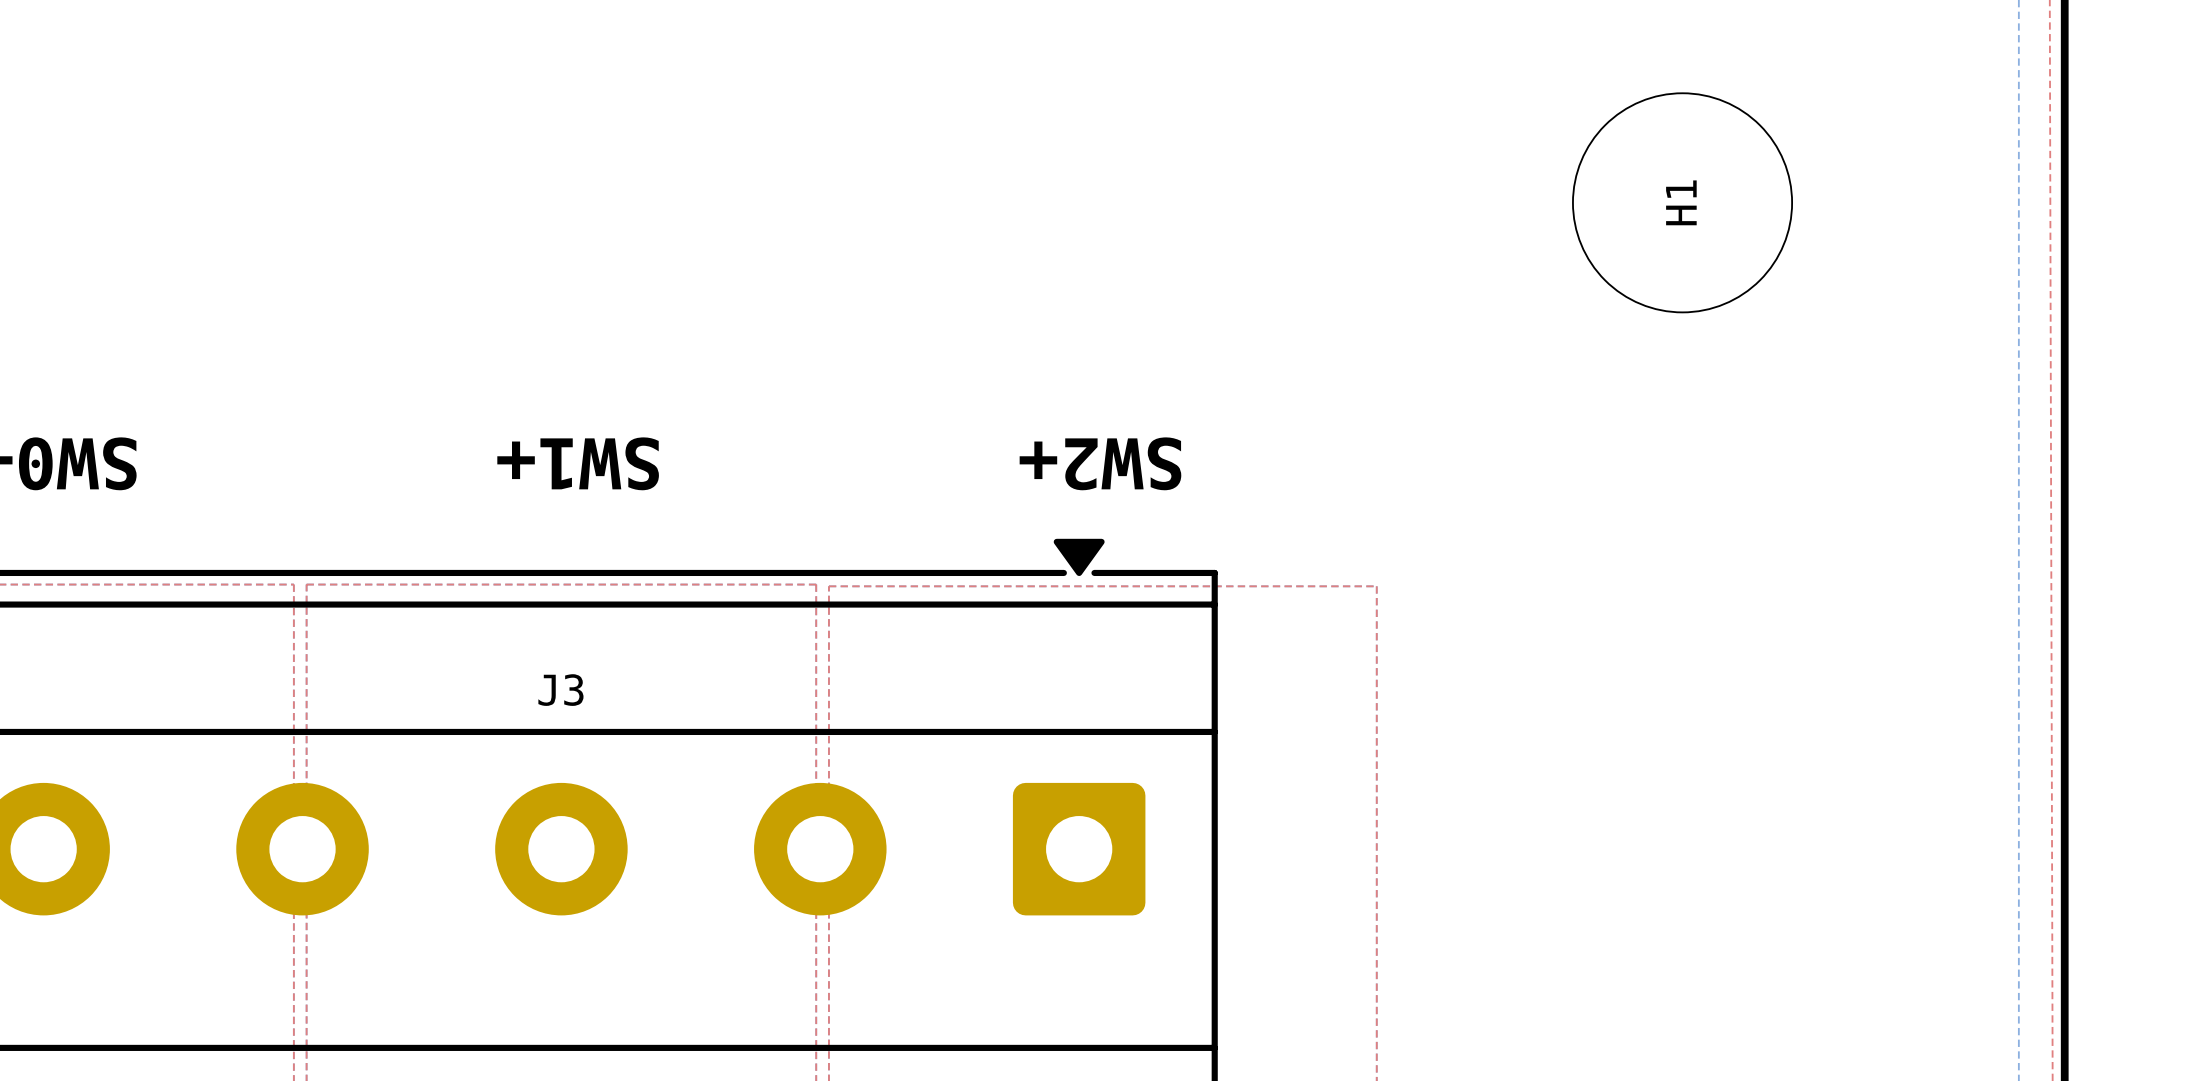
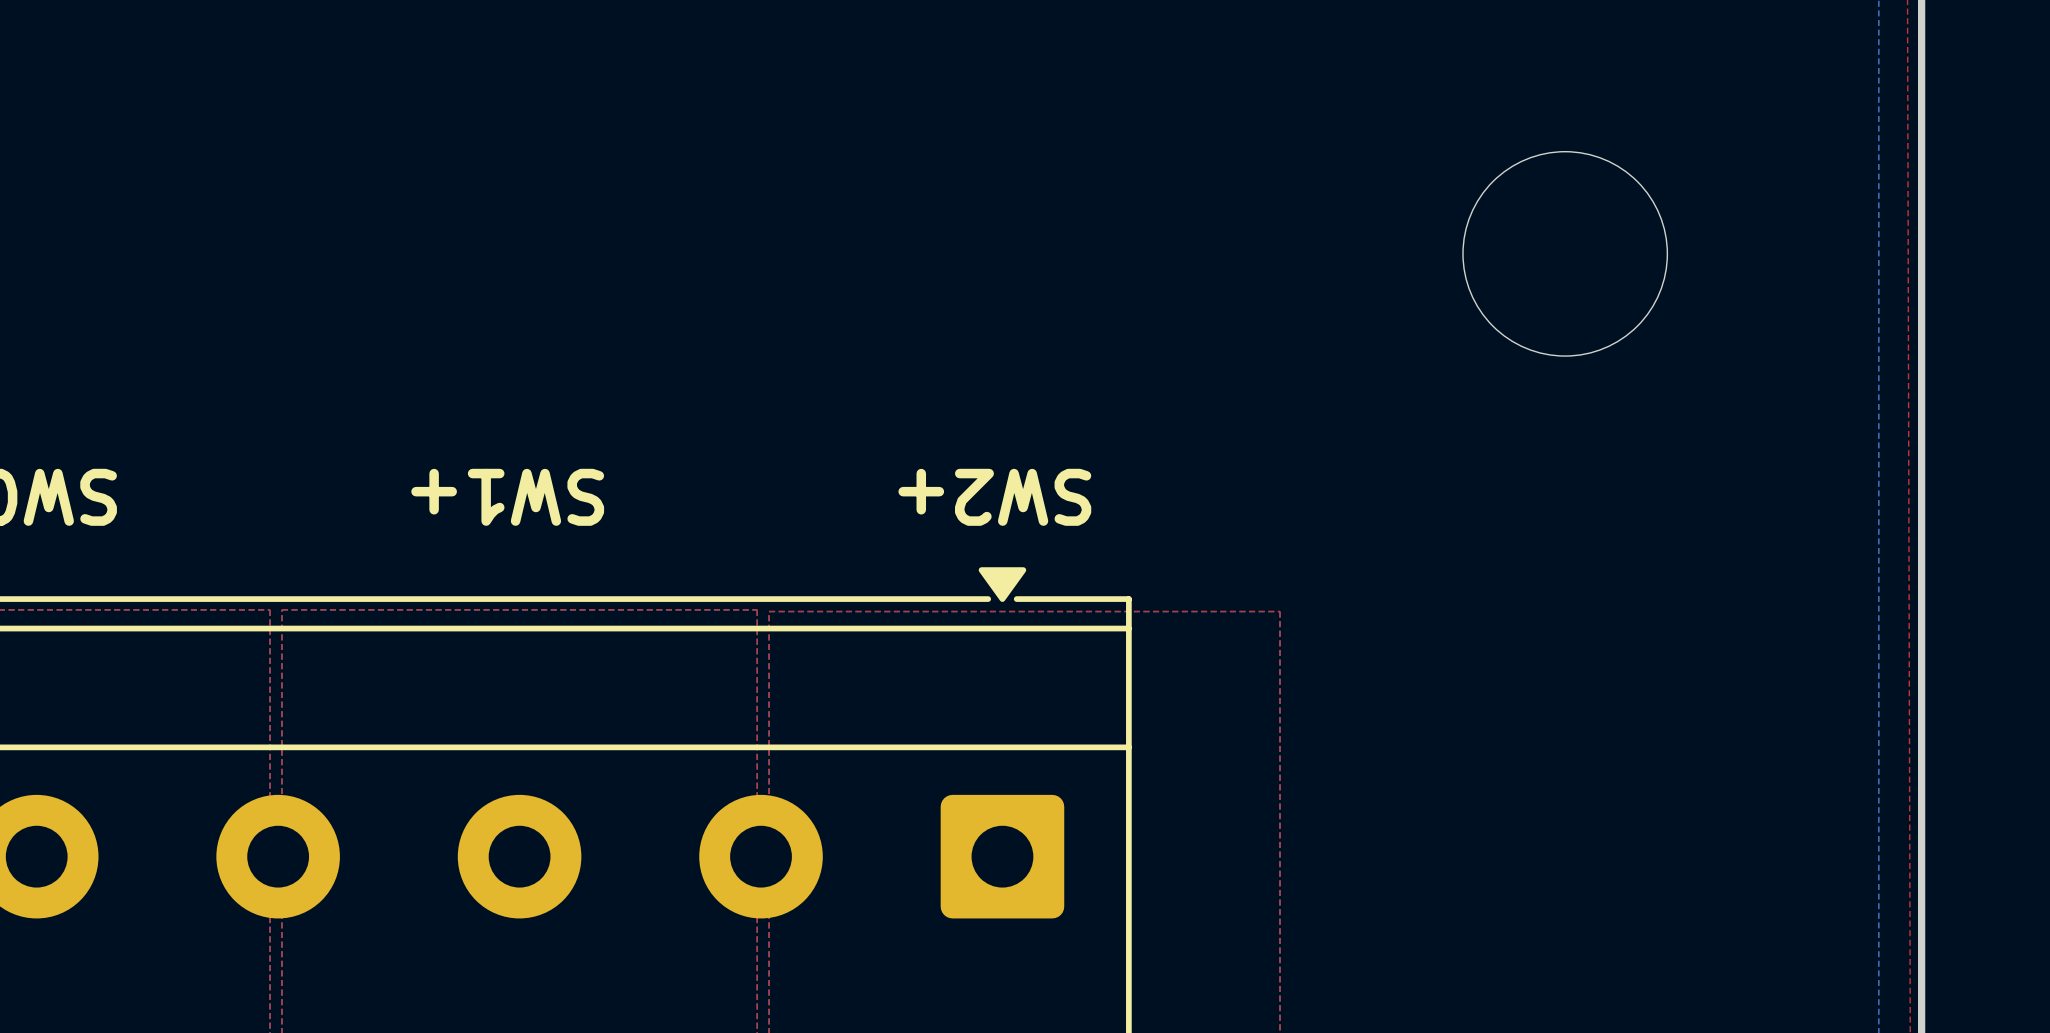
H1 name: H1 (1681, 202) -> none
J3 name: J3 (560, 690) -> none

